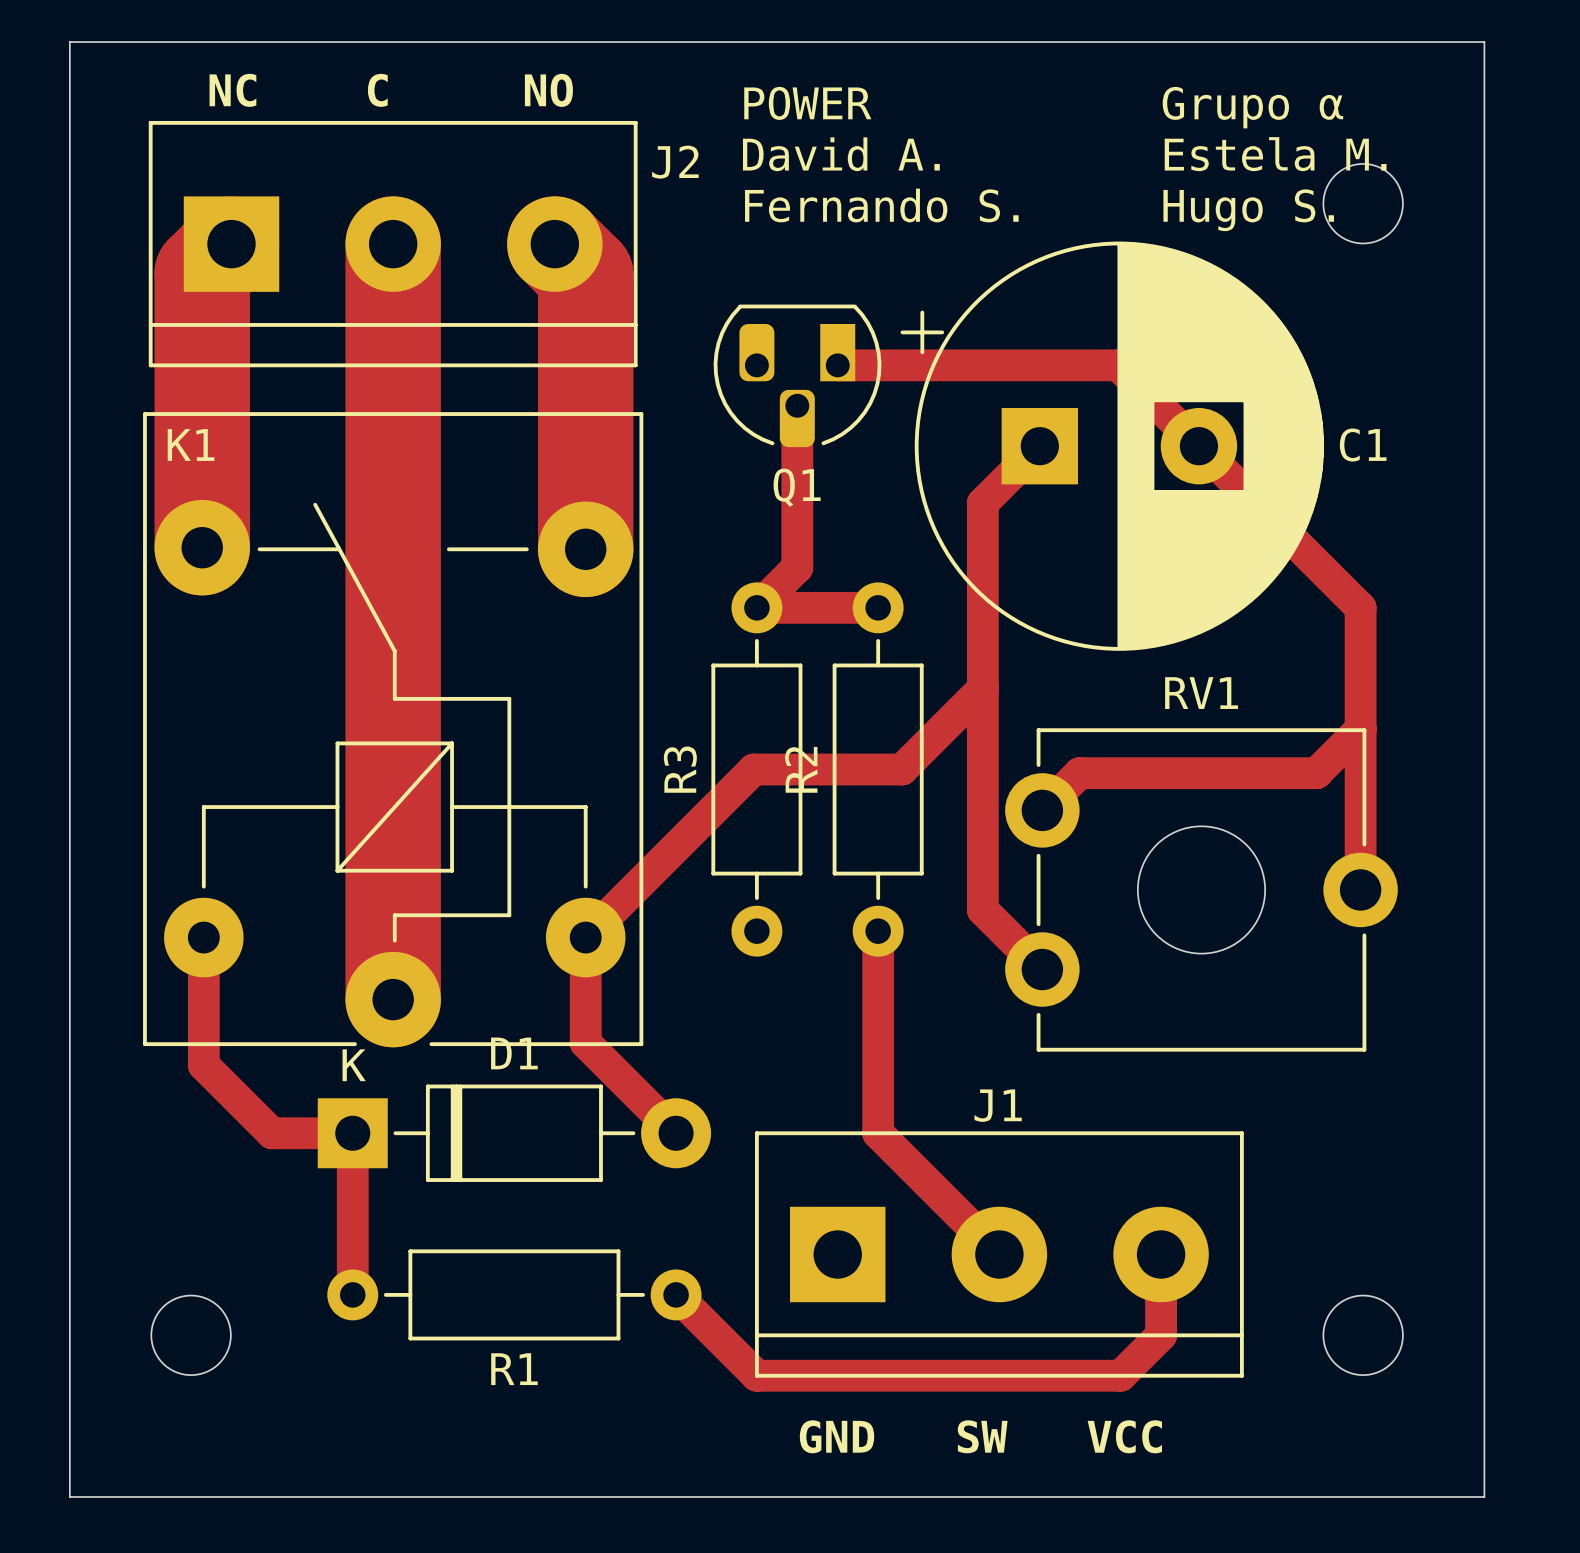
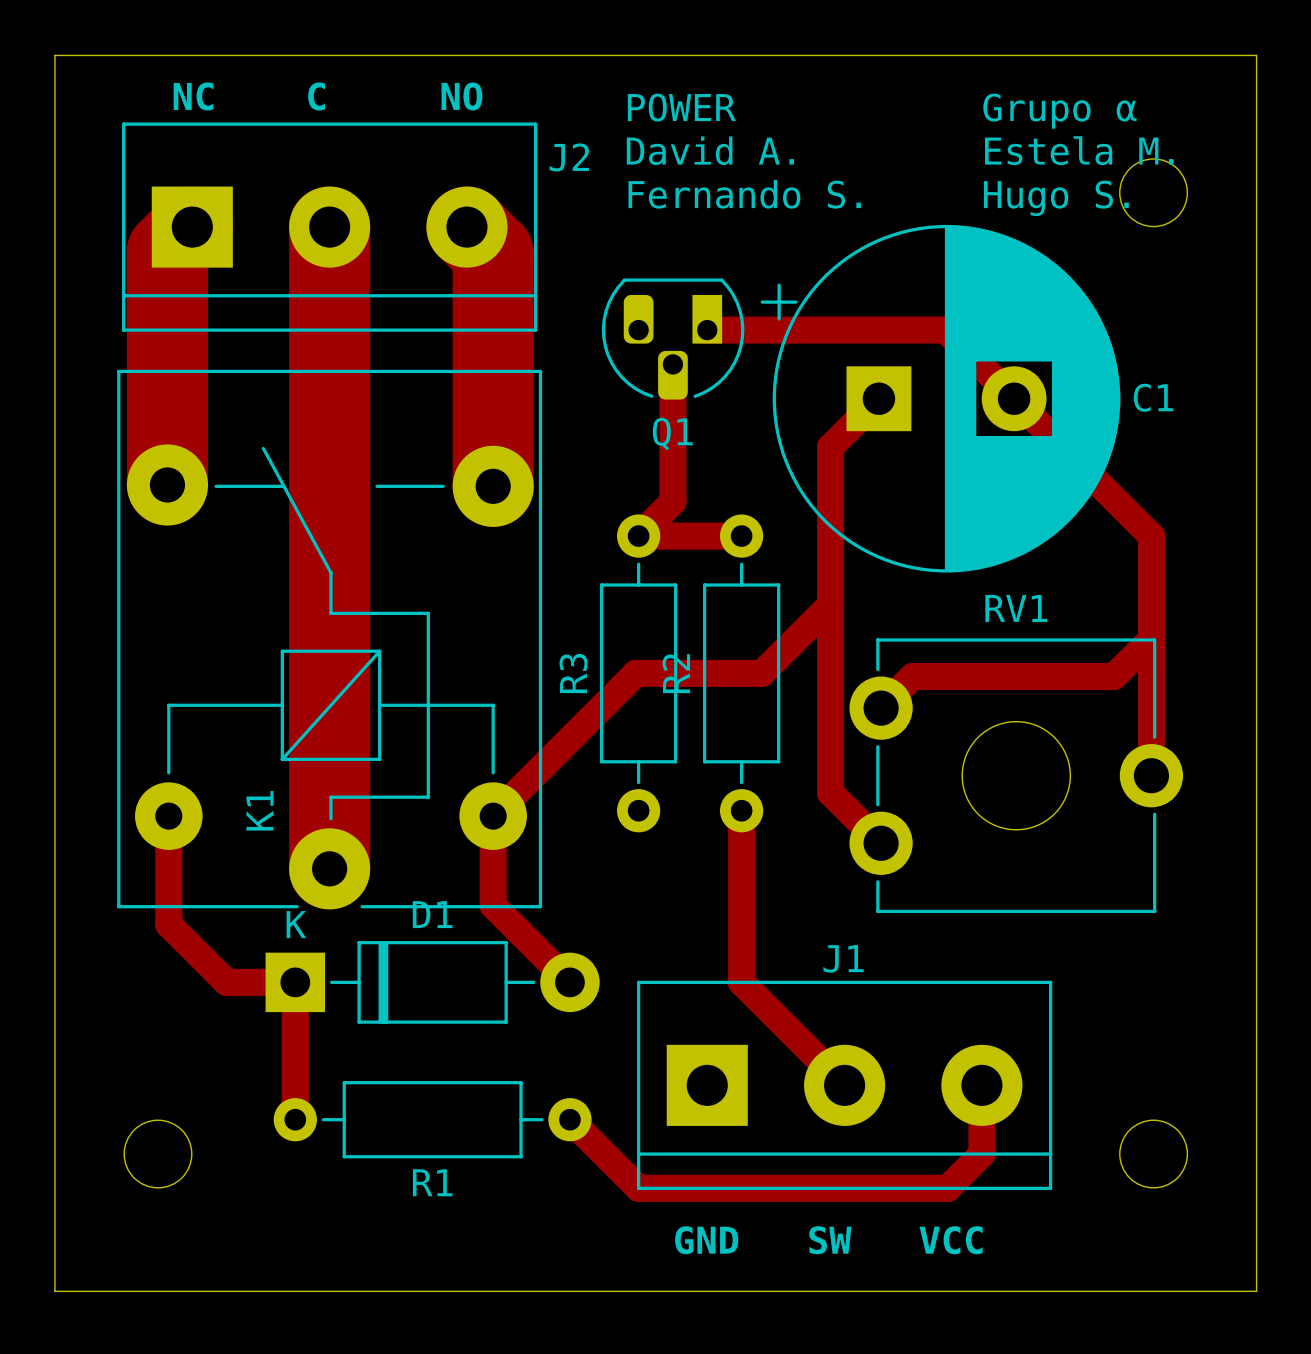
K1 name rotation: 0° (191, 445) -> 90° counterclockwise (259, 810)
K1 name position: K1 (191, 445) -> K1 (259, 810)

